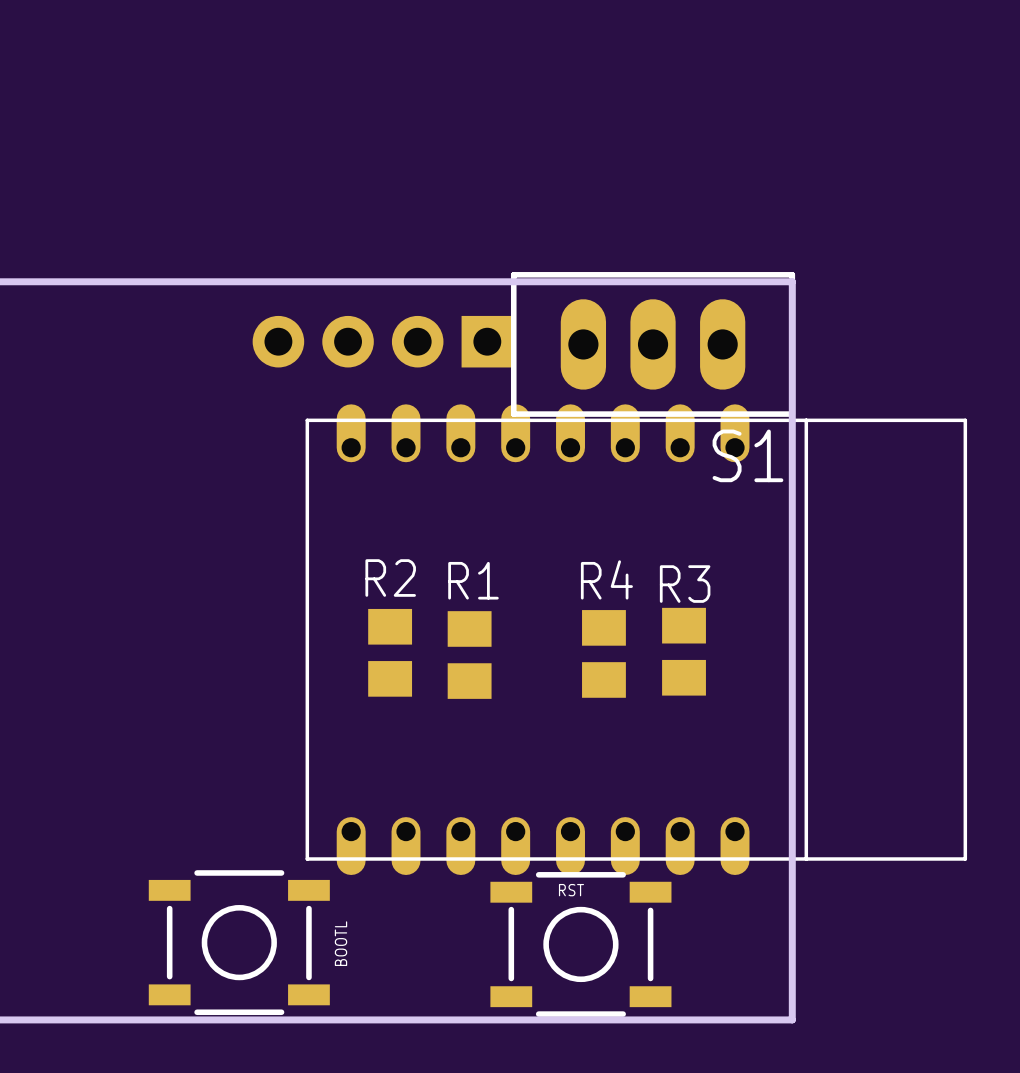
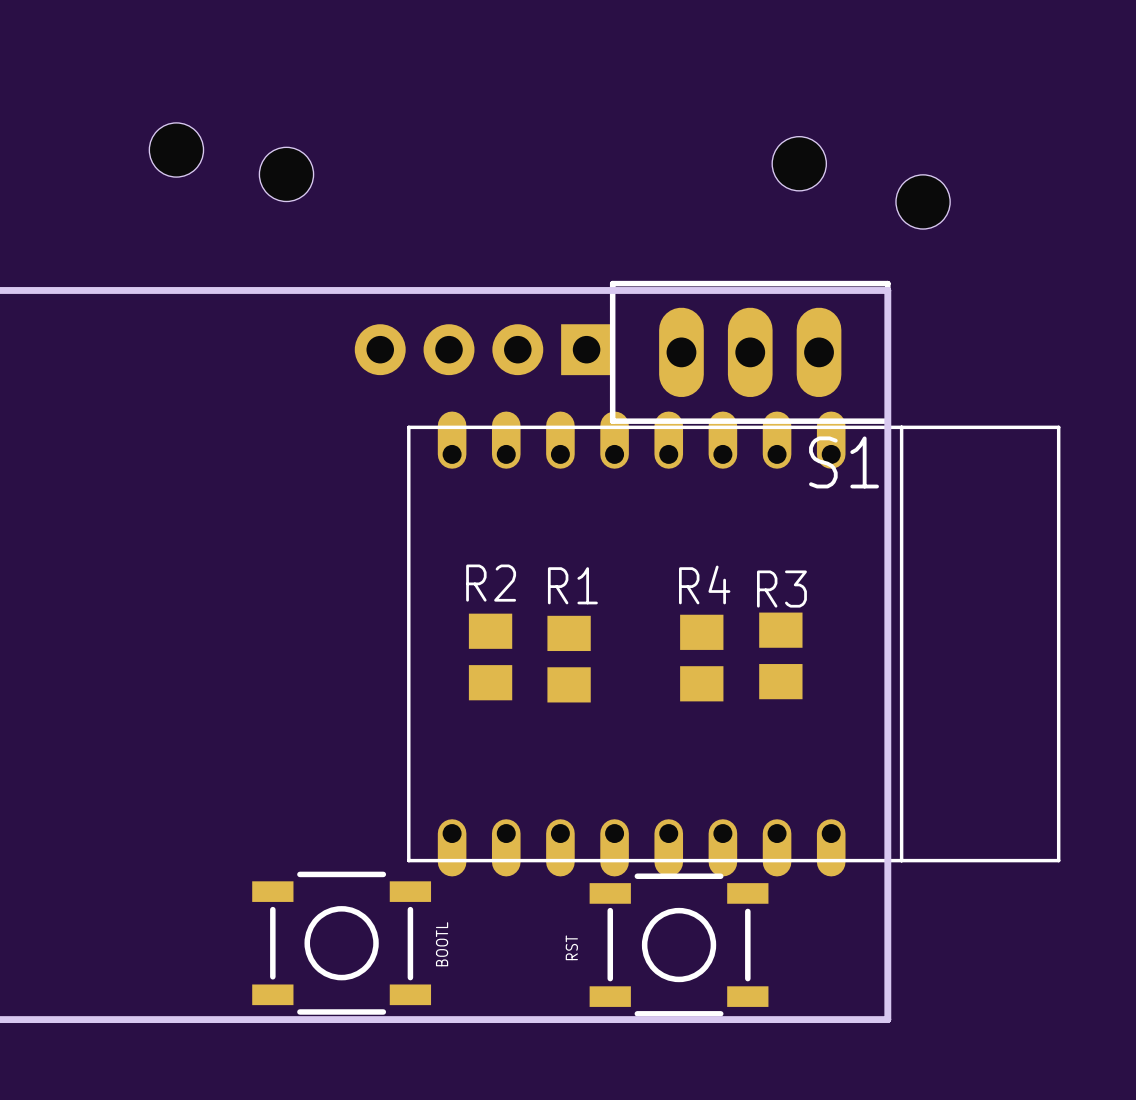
hole: none -> (176, 149)
hole: none -> (799, 163)
hole: none -> (286, 174)
hole: none -> (923, 201)
RST name rotation: 0° (571, 890) -> 90° counterclockwise (571, 947)
RST name position: RST (571, 890) -> RST (571, 947)

